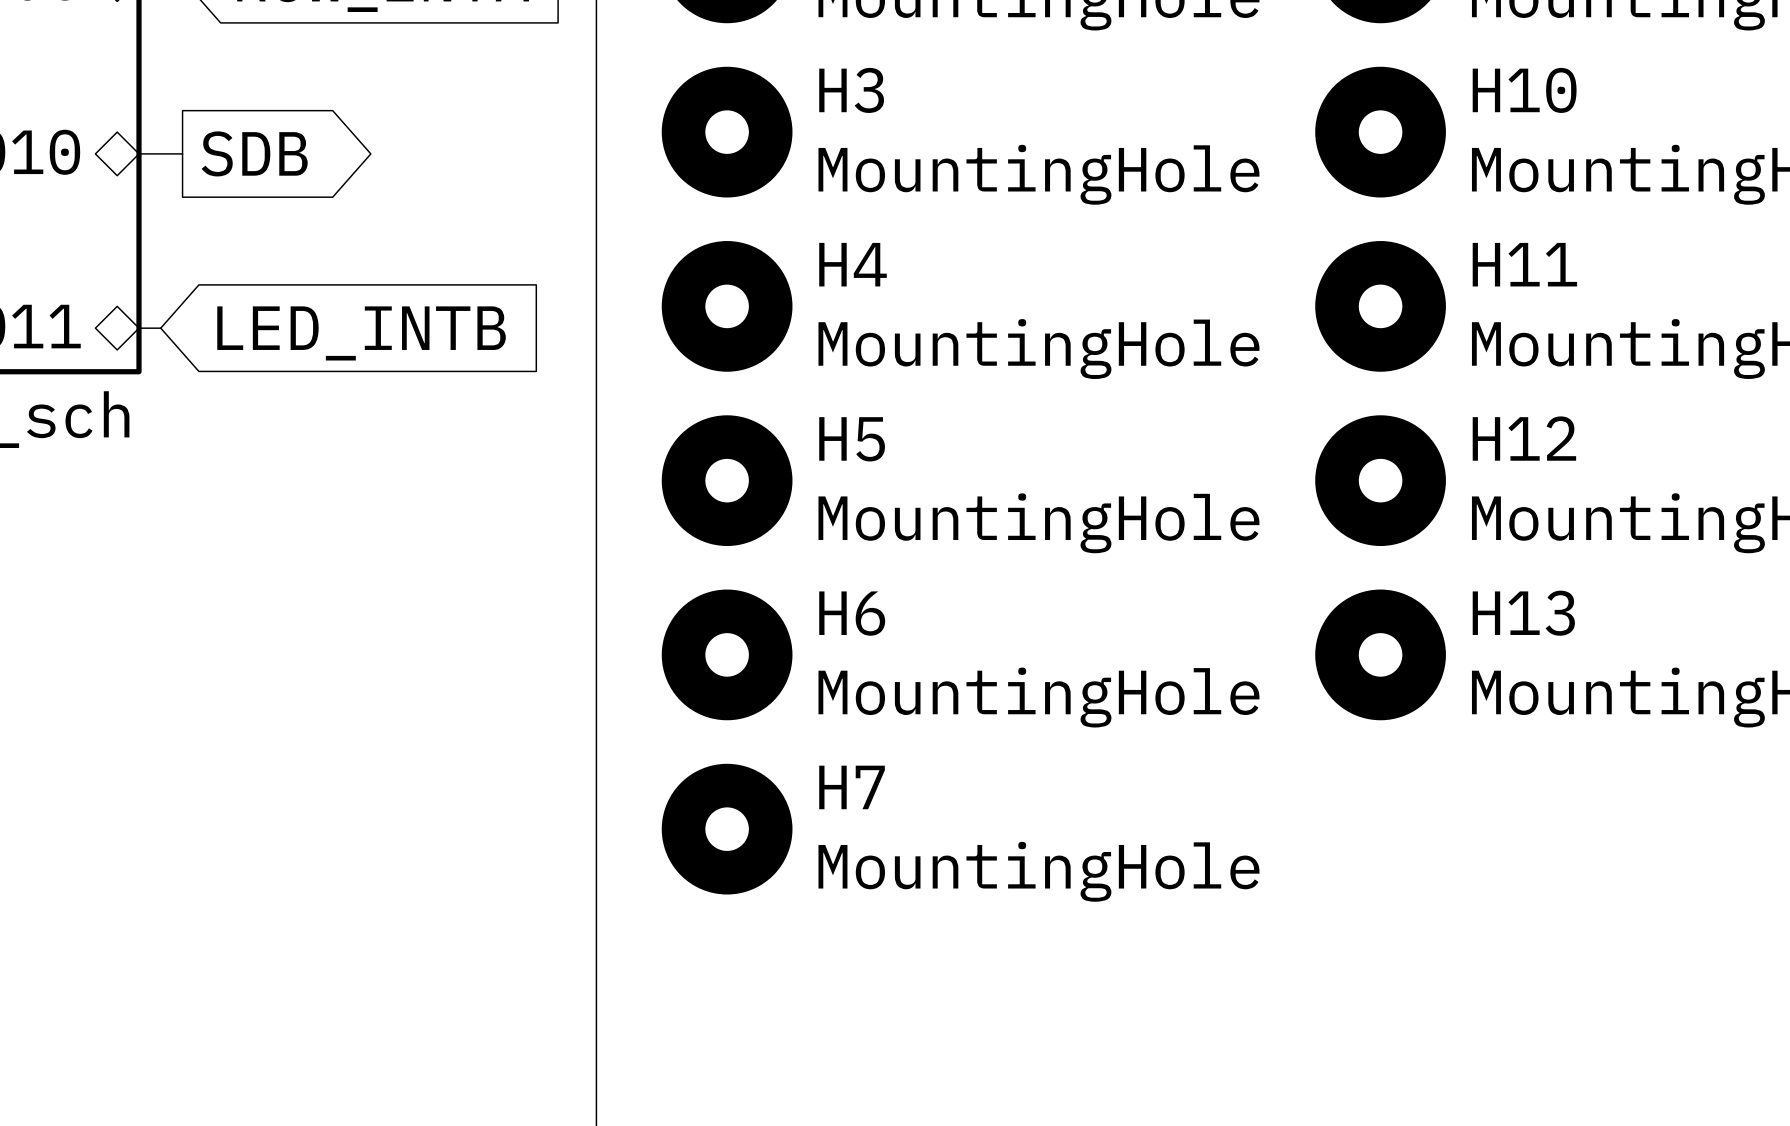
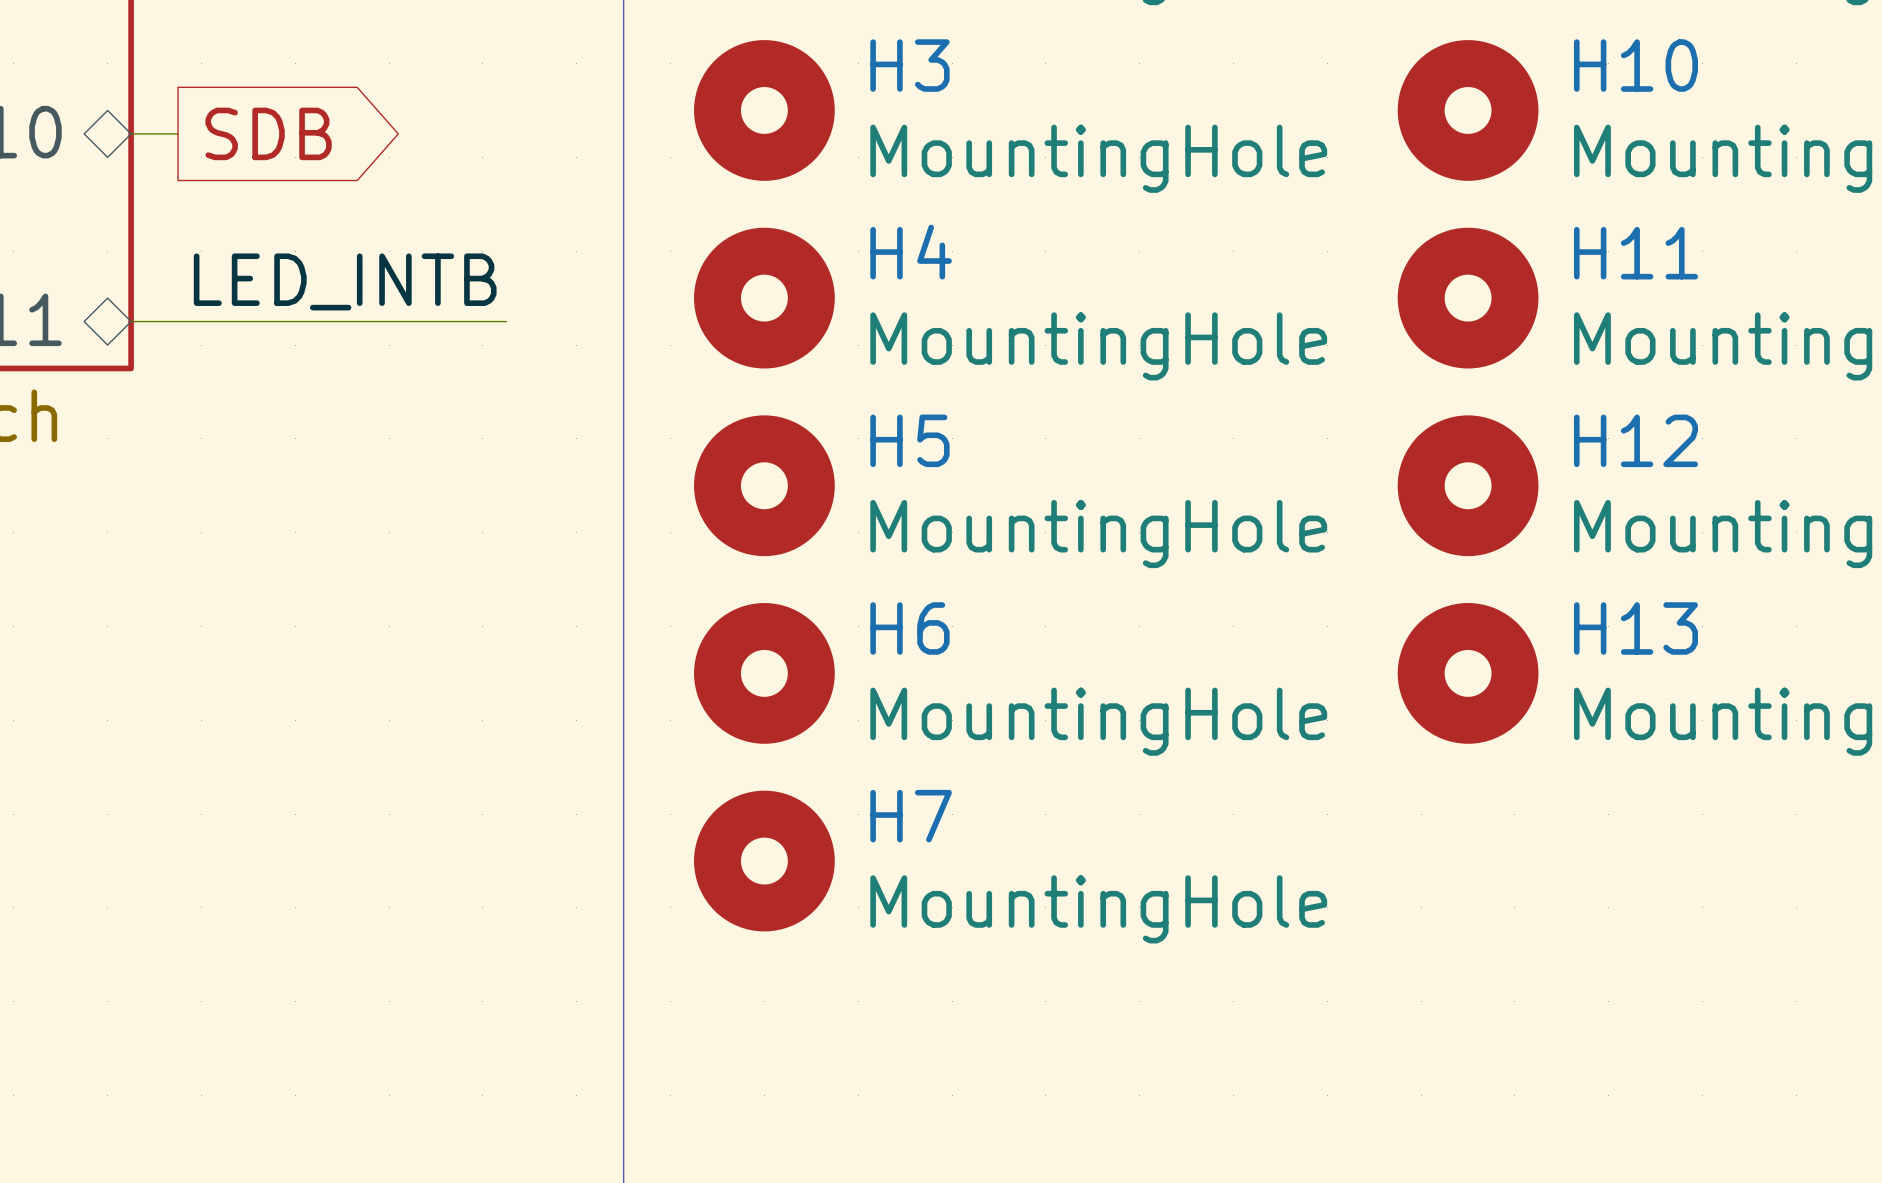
label: none -> LED_INTB (345, 281)
wire: none -> (154, 321) (506, 321)
global label: LED_INTB (361, 333) -> none

